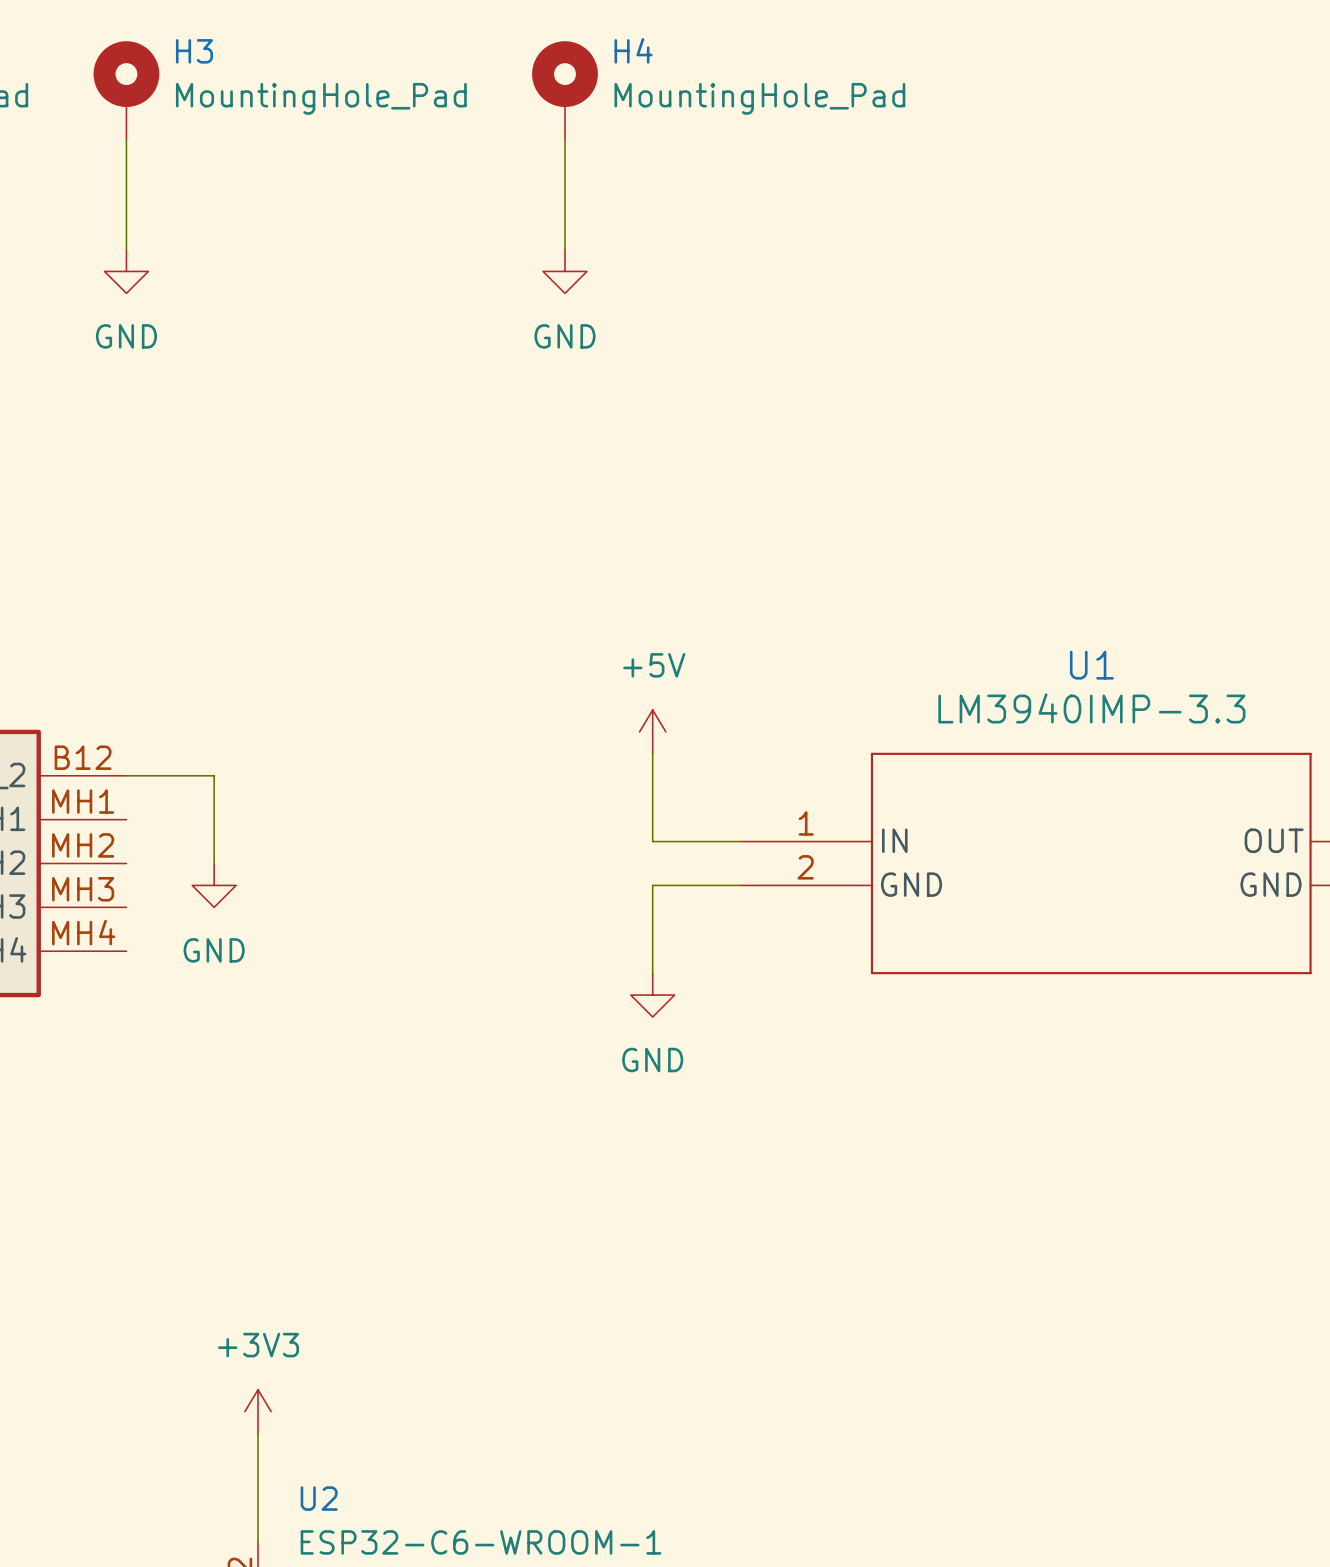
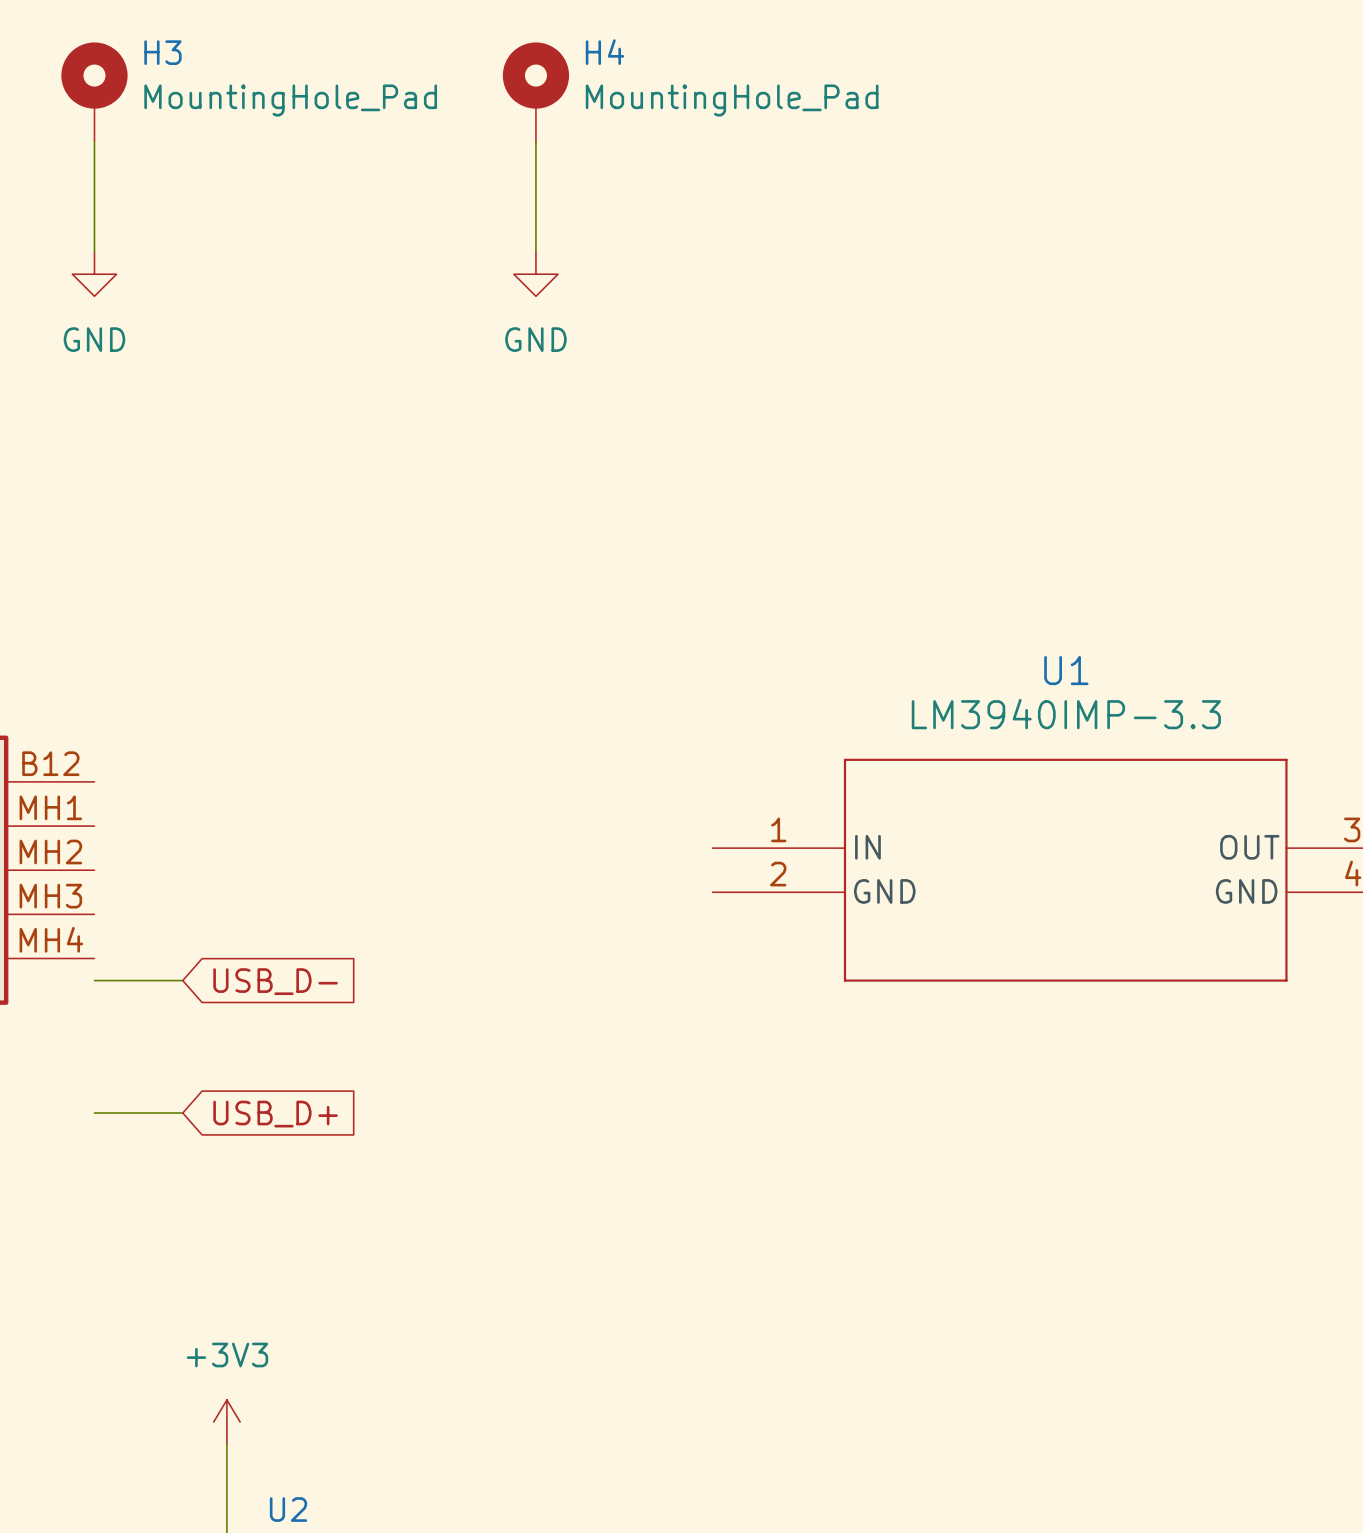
power symbol: +5V (652, 731) -> none
wire: (652, 753) (652, 841) (740, 841) -> none
wire: (126, 775) (214, 775) (214, 863) -> none
power symbol: GND (214, 885) -> none
wire: (740, 885) (652, 885) (652, 973) -> none
wire: none -> (94, 980) (182, 980)
global label: none -> USB_D- (275, 981)
power symbol: GND (652, 995) -> none
wire: none -> (94, 1113) (182, 1113)
global label: none -> USB_D+ (275, 1114)

